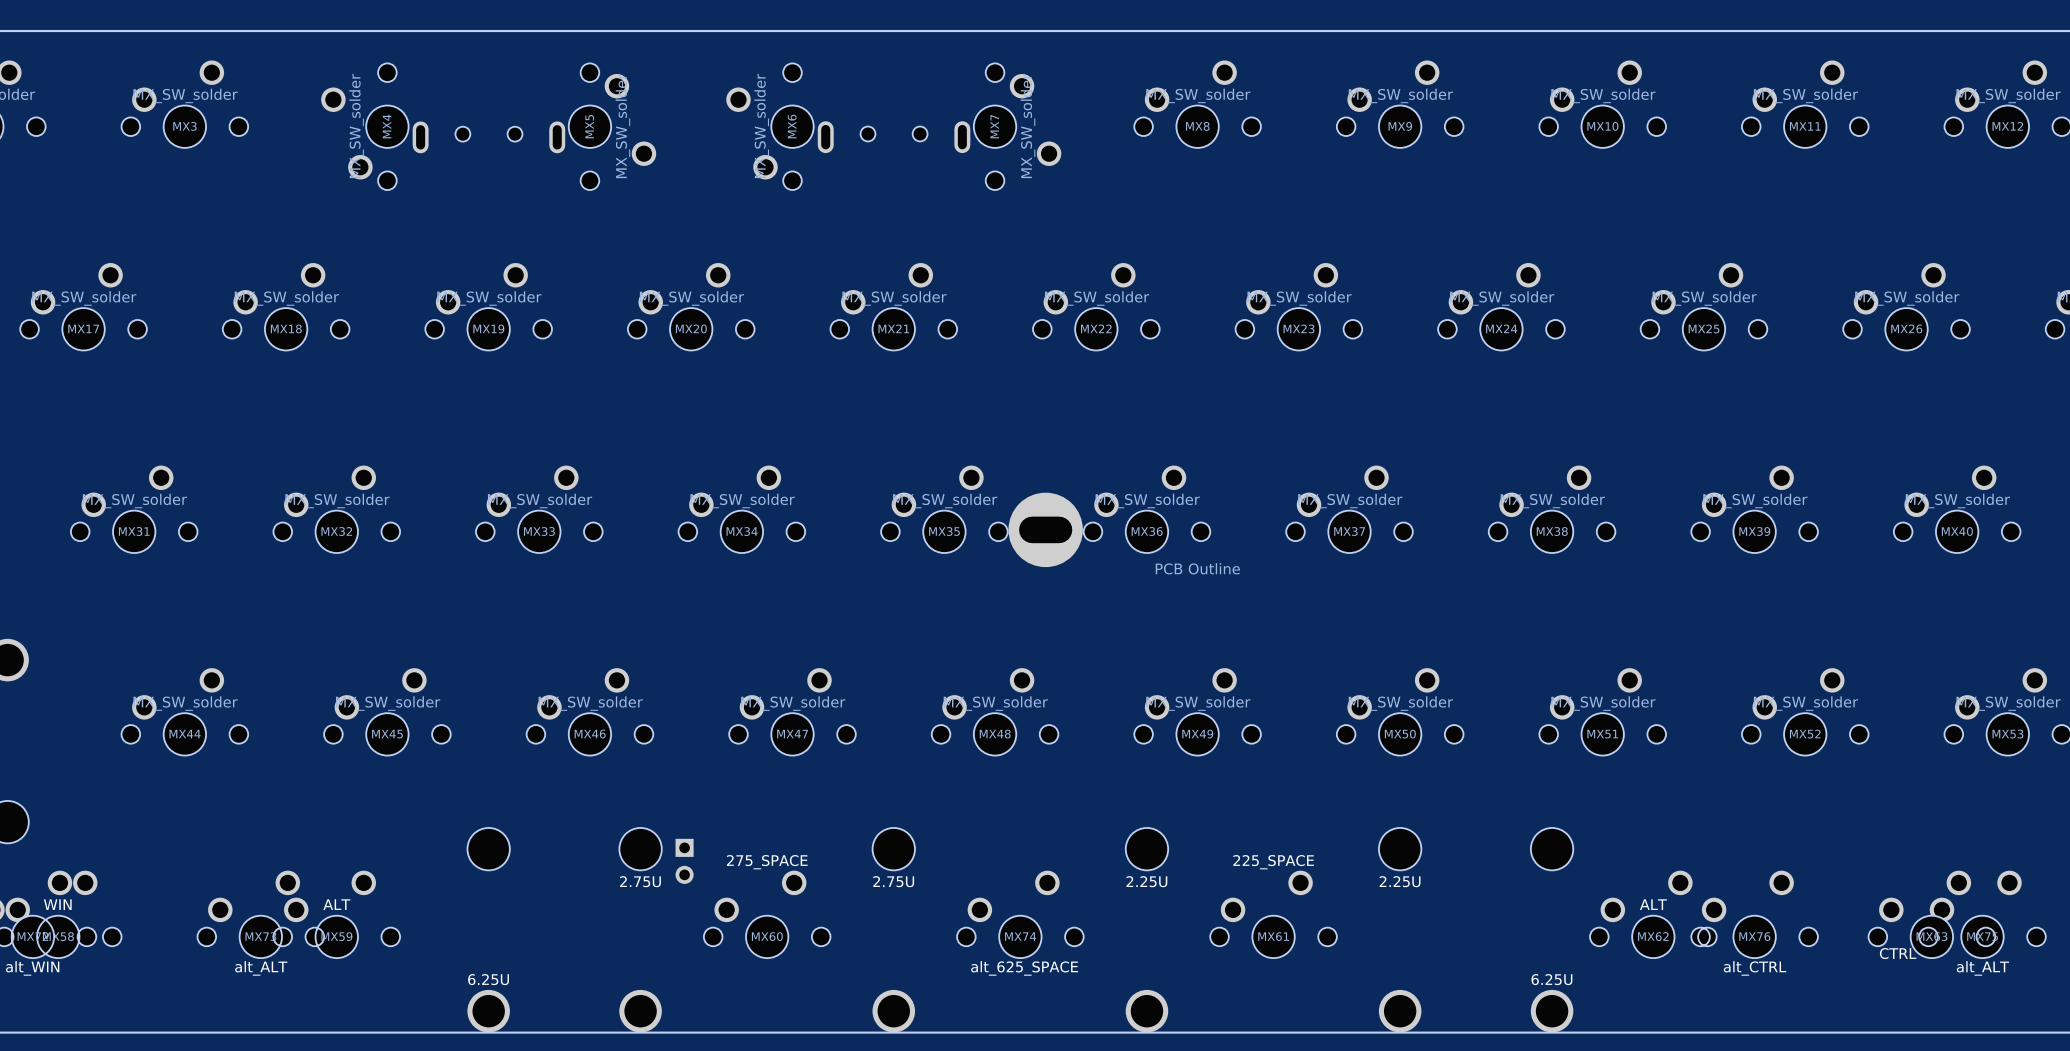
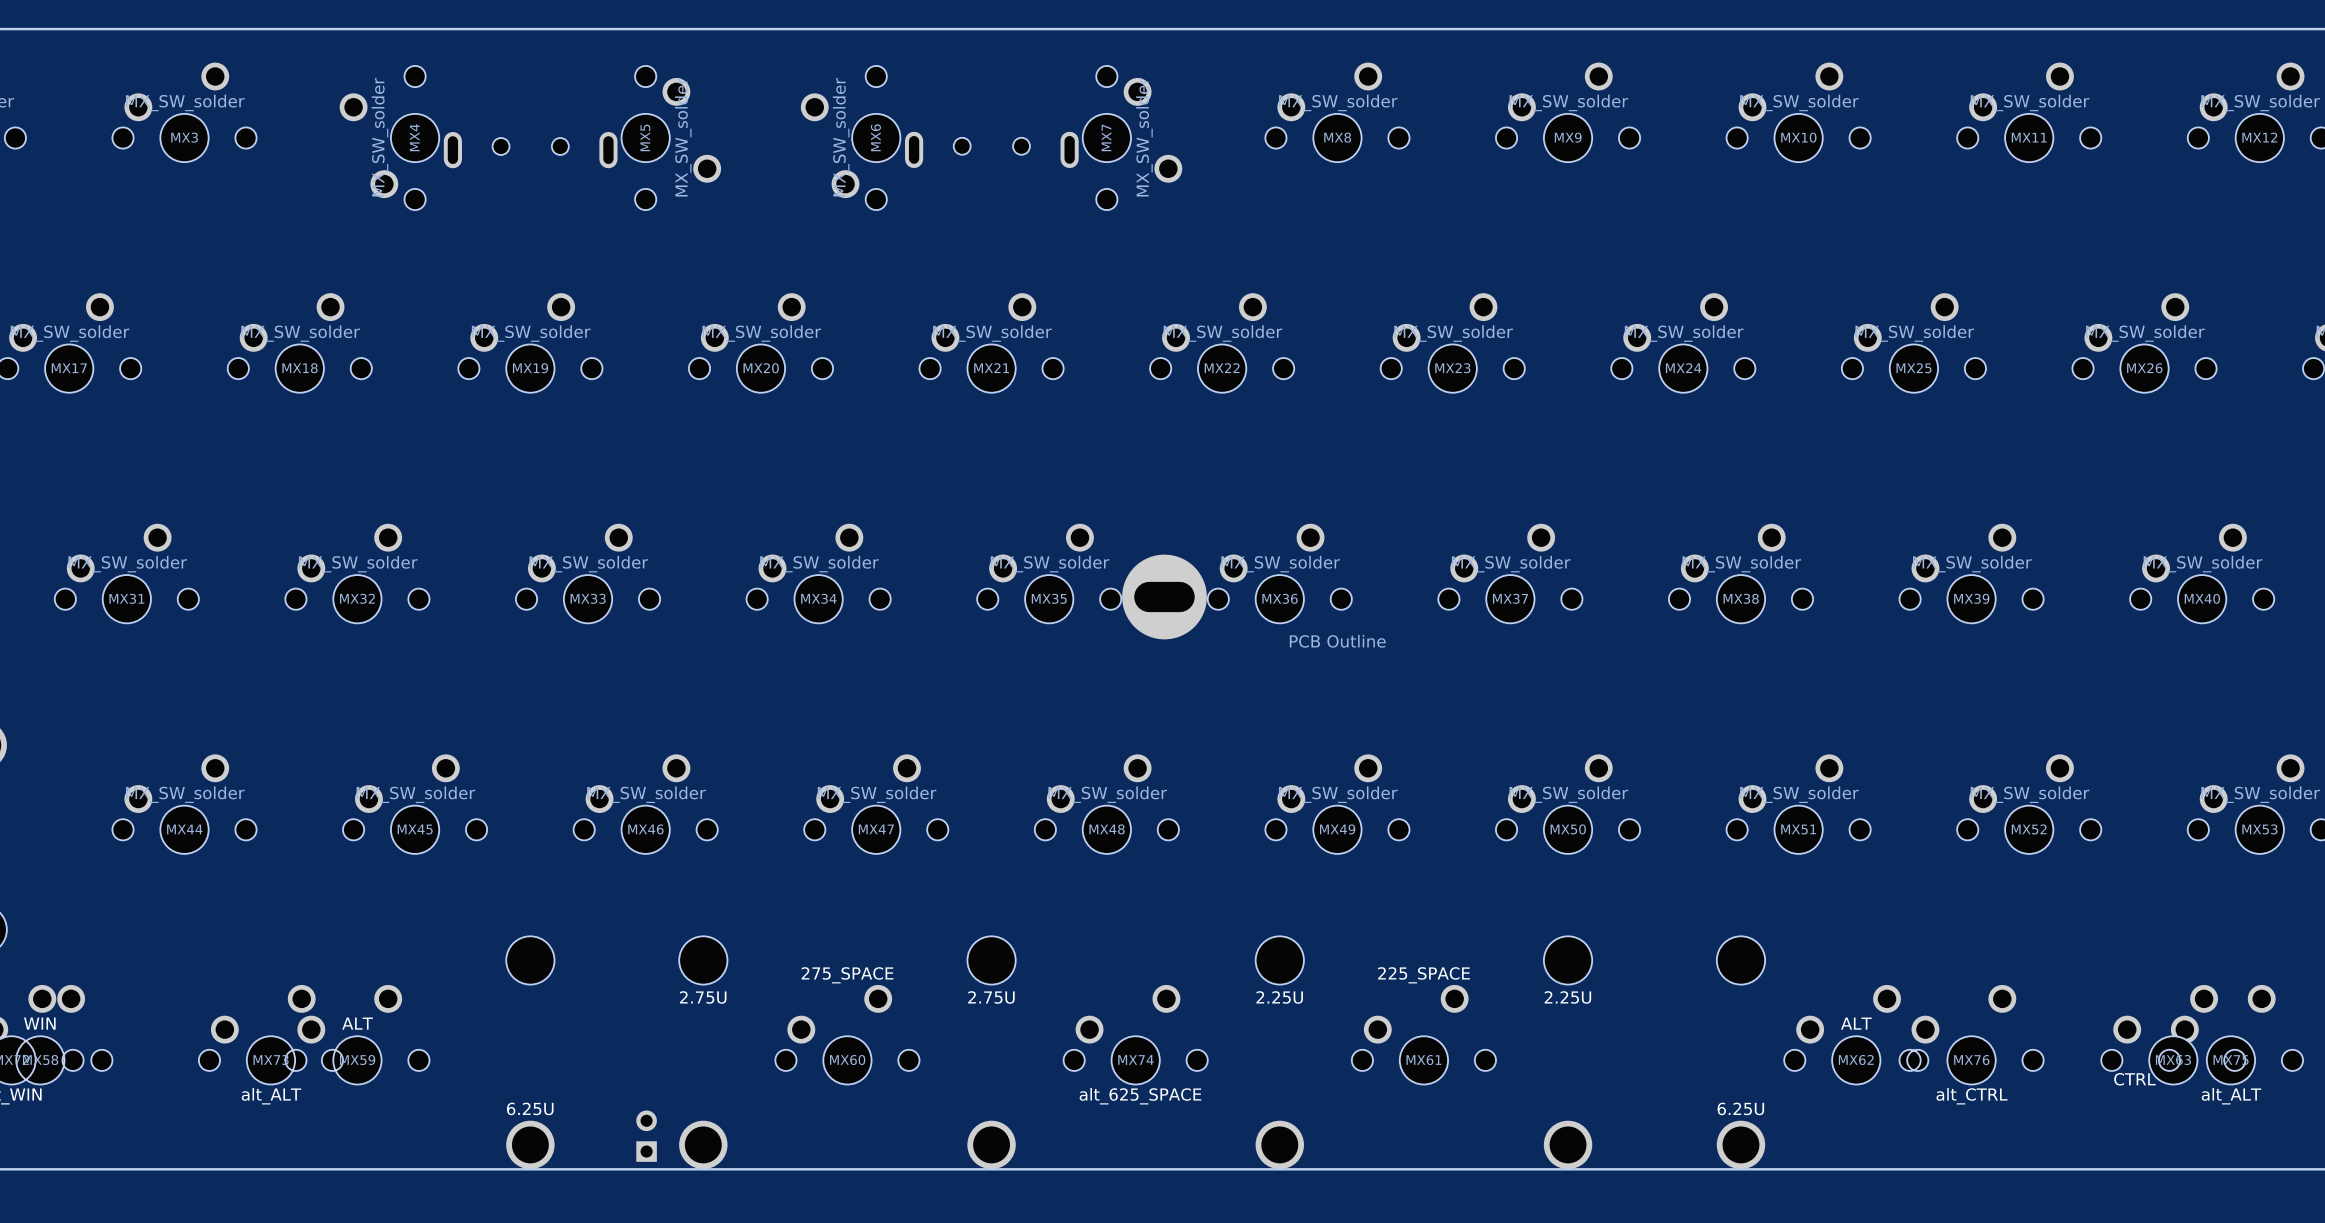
part rotation: 0° (684, 861) -> 180° (646, 1136)
part position: (684, 861) -> (646, 1136)

